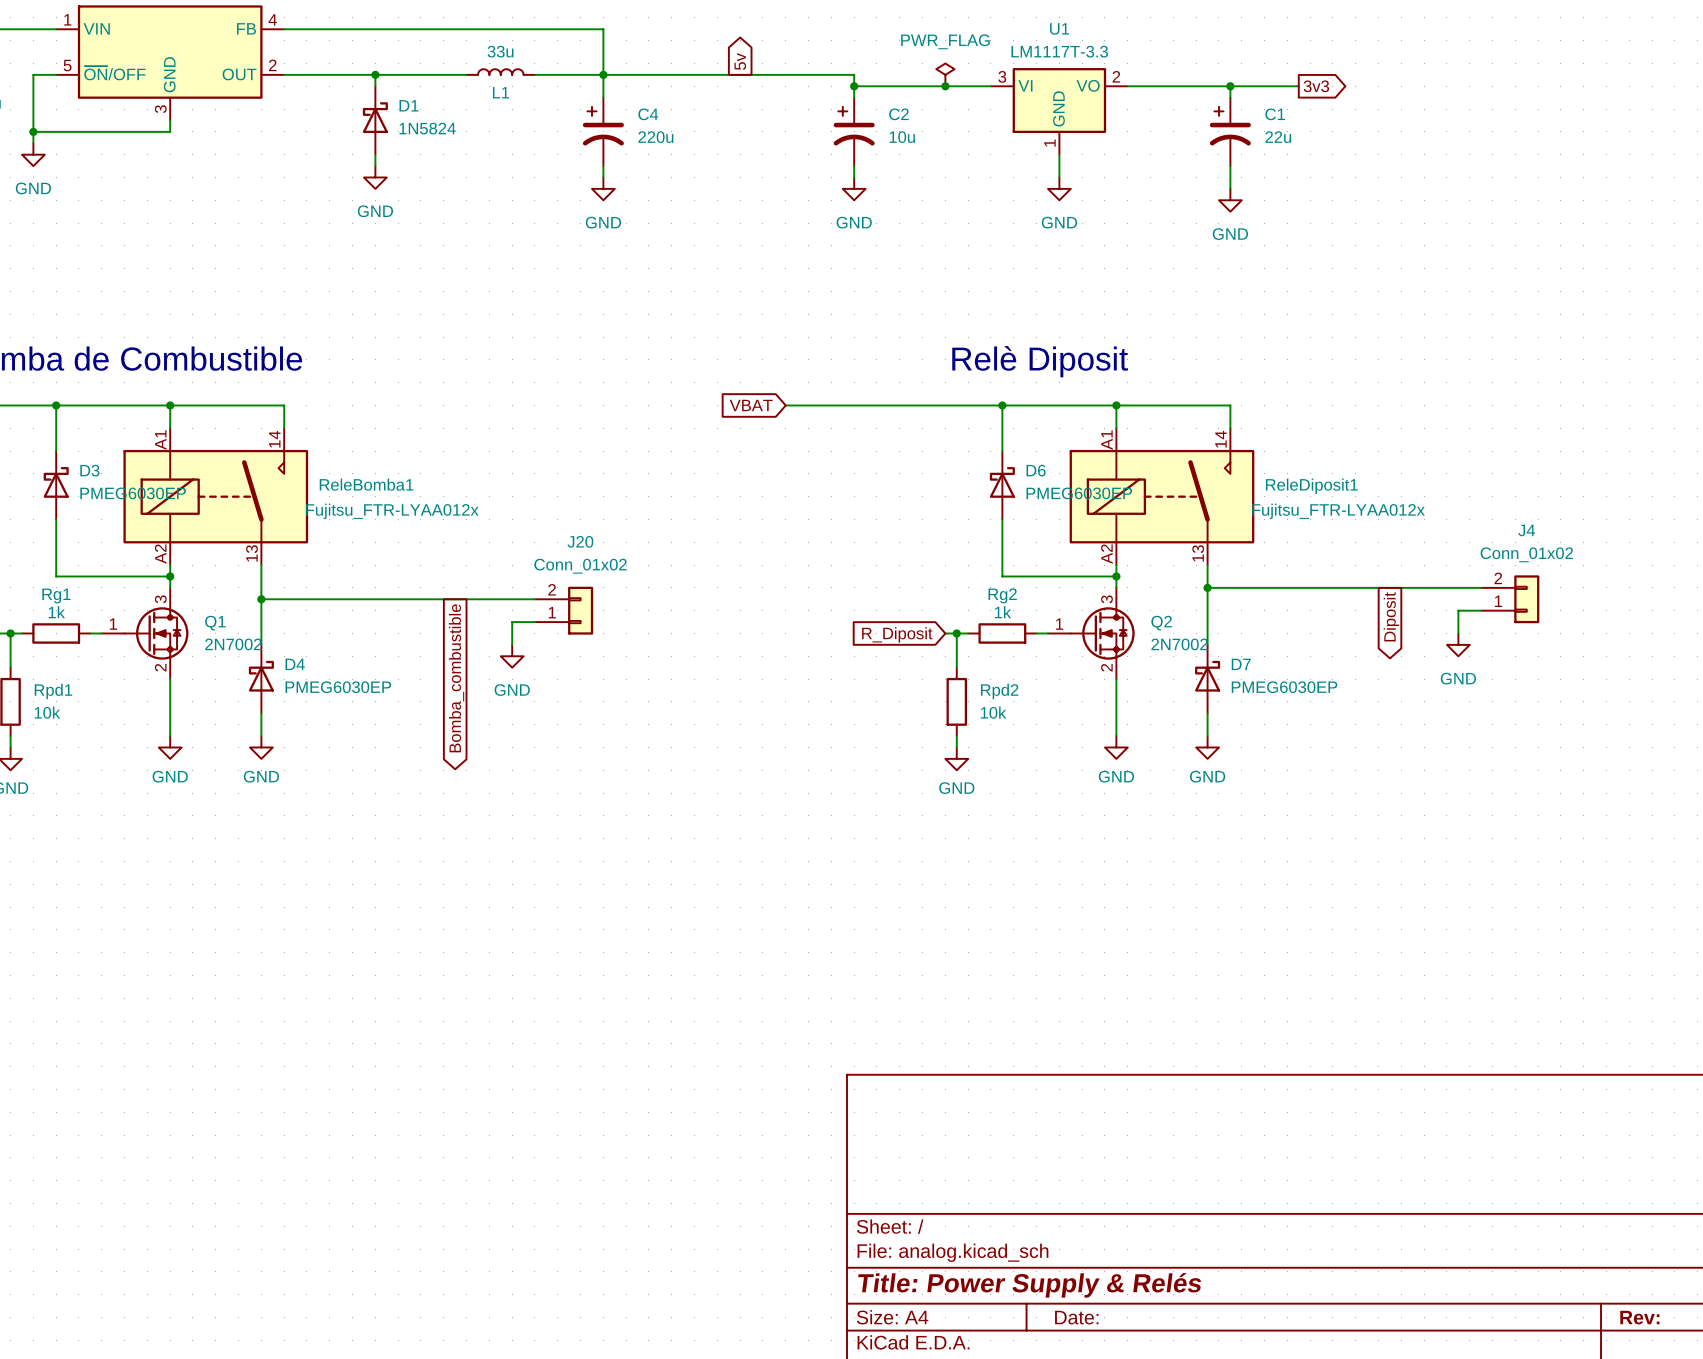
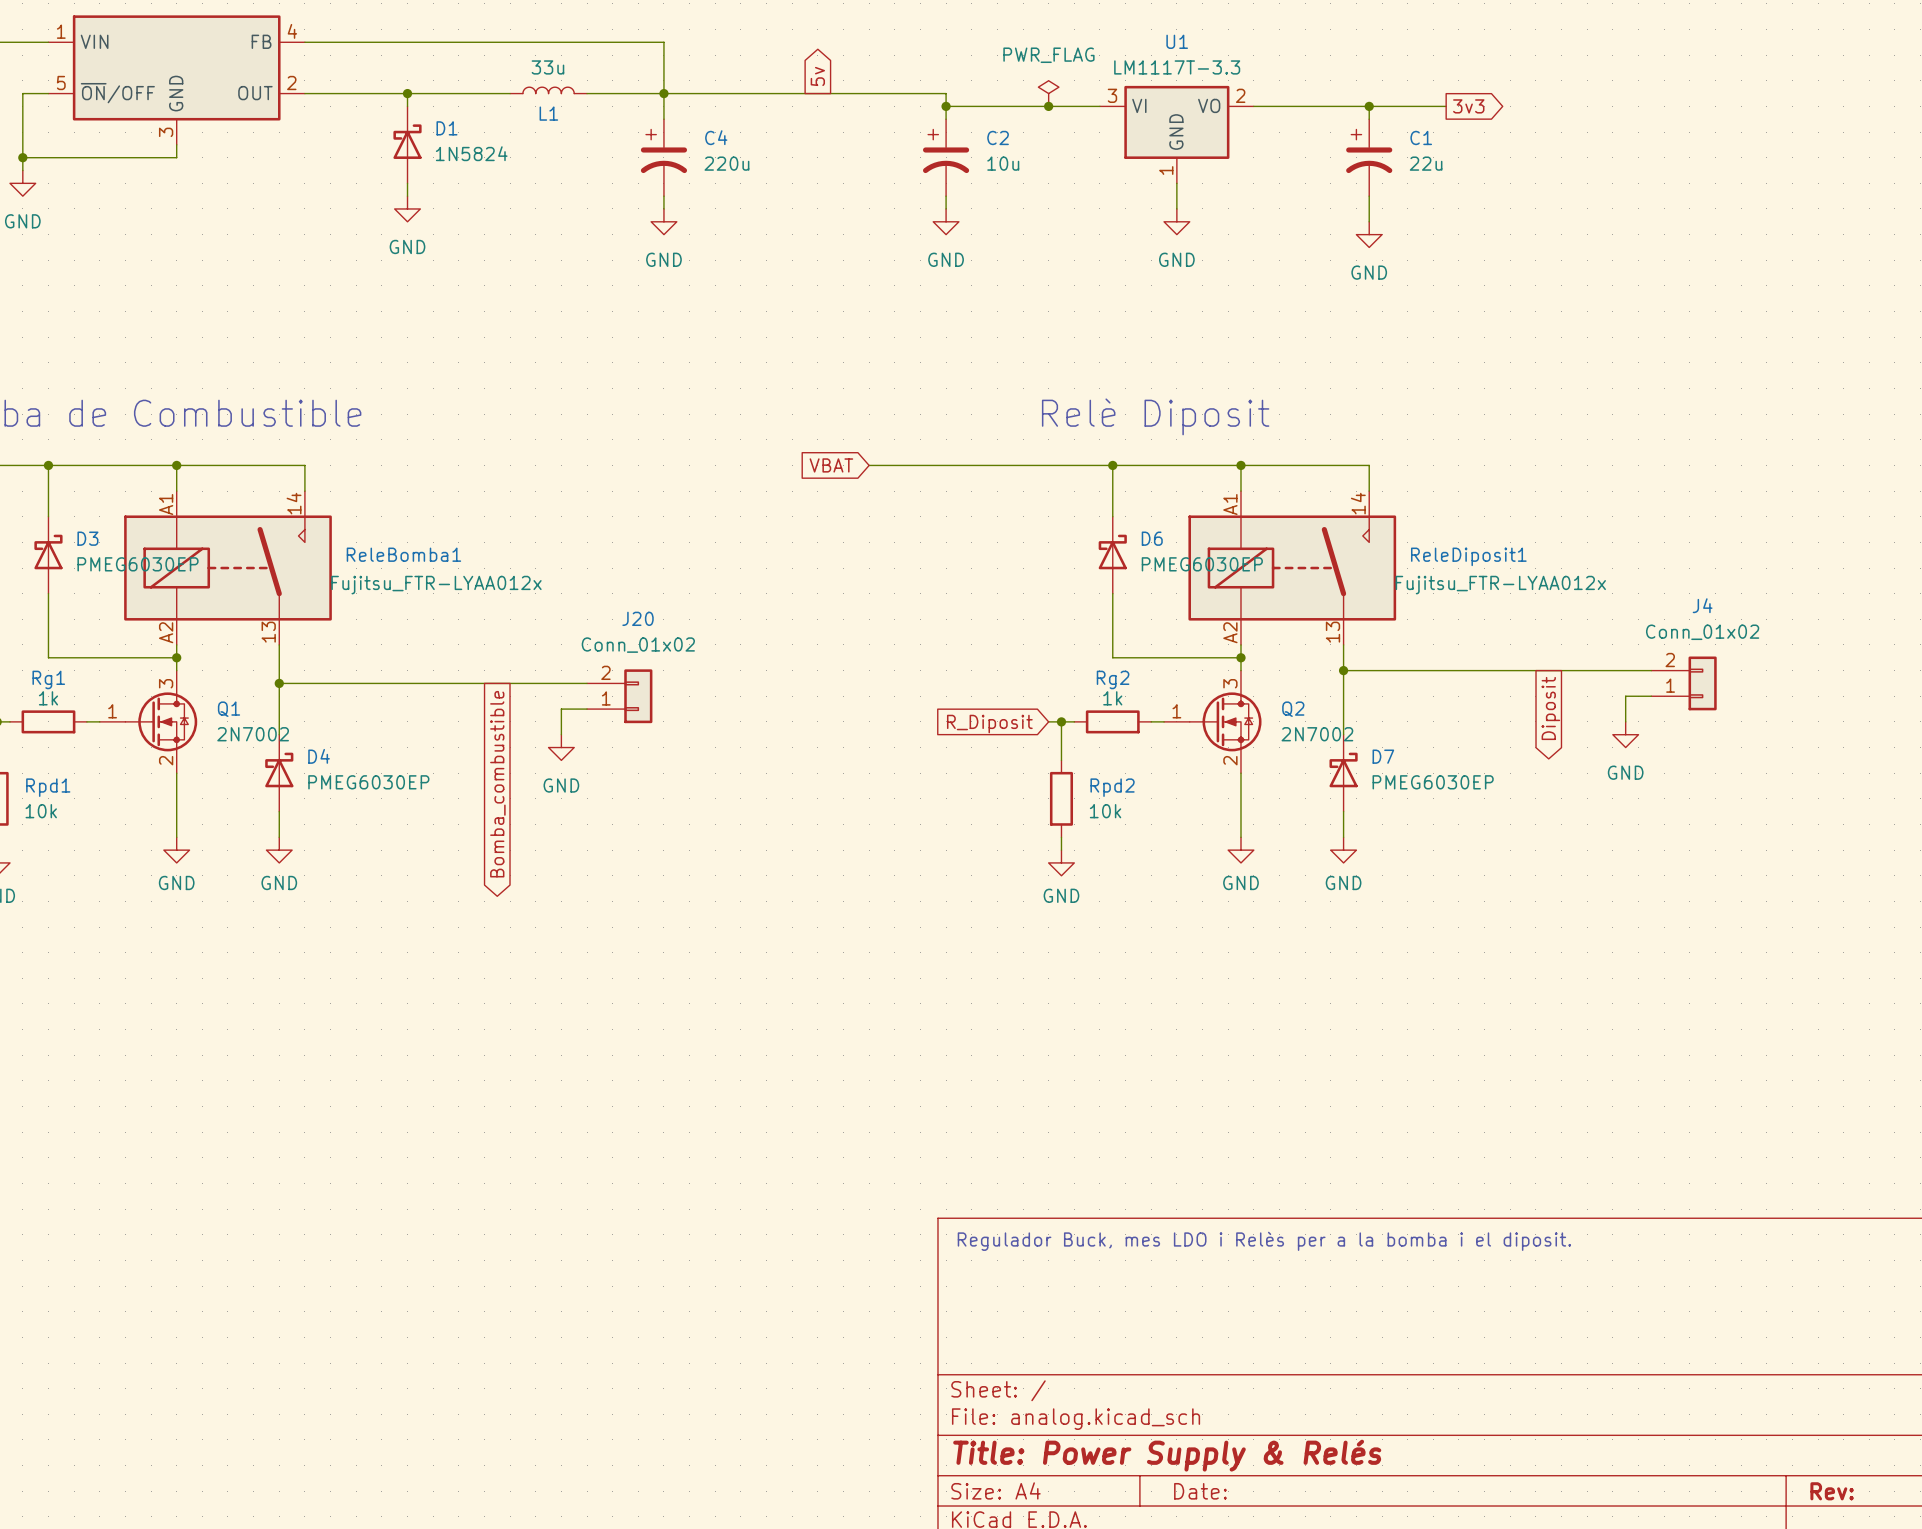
text: none -> Regulador Buck, mes LDO i Relès per a la bomba i el diposit. (1264, 1241)

